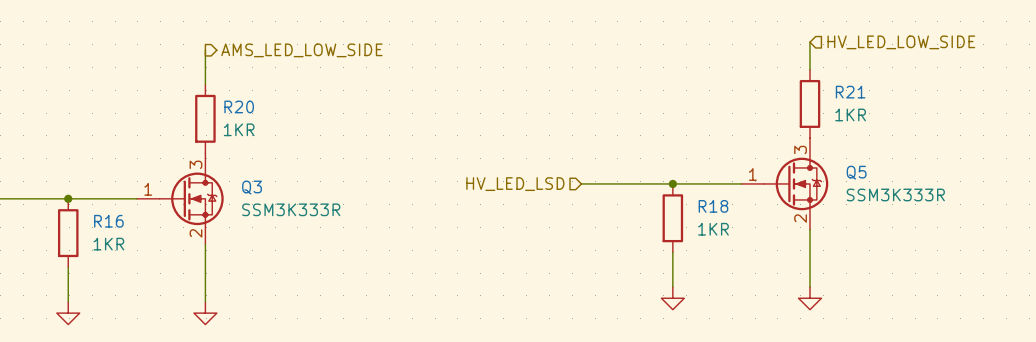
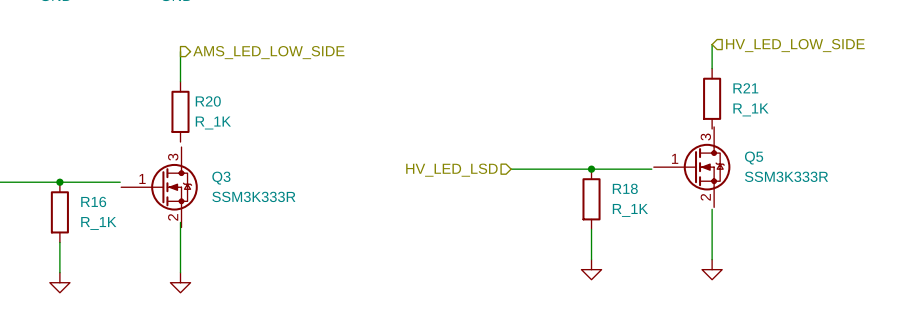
R21 value: 1KR (850, 114) -> R_1K (750, 109)
R20 value: 1KR (239, 129) -> R_1K (213, 123)
Q5 symbol: [741, 138, 829, 230] -> [653, 126, 731, 208]
Q3 symbol: [136, 153, 224, 245] -> [121, 147, 198, 228]
R18 value: 1KR (713, 229) -> R_1K (630, 210)
R16 value: 1KR (108, 244) -> R_1K (98, 223)

